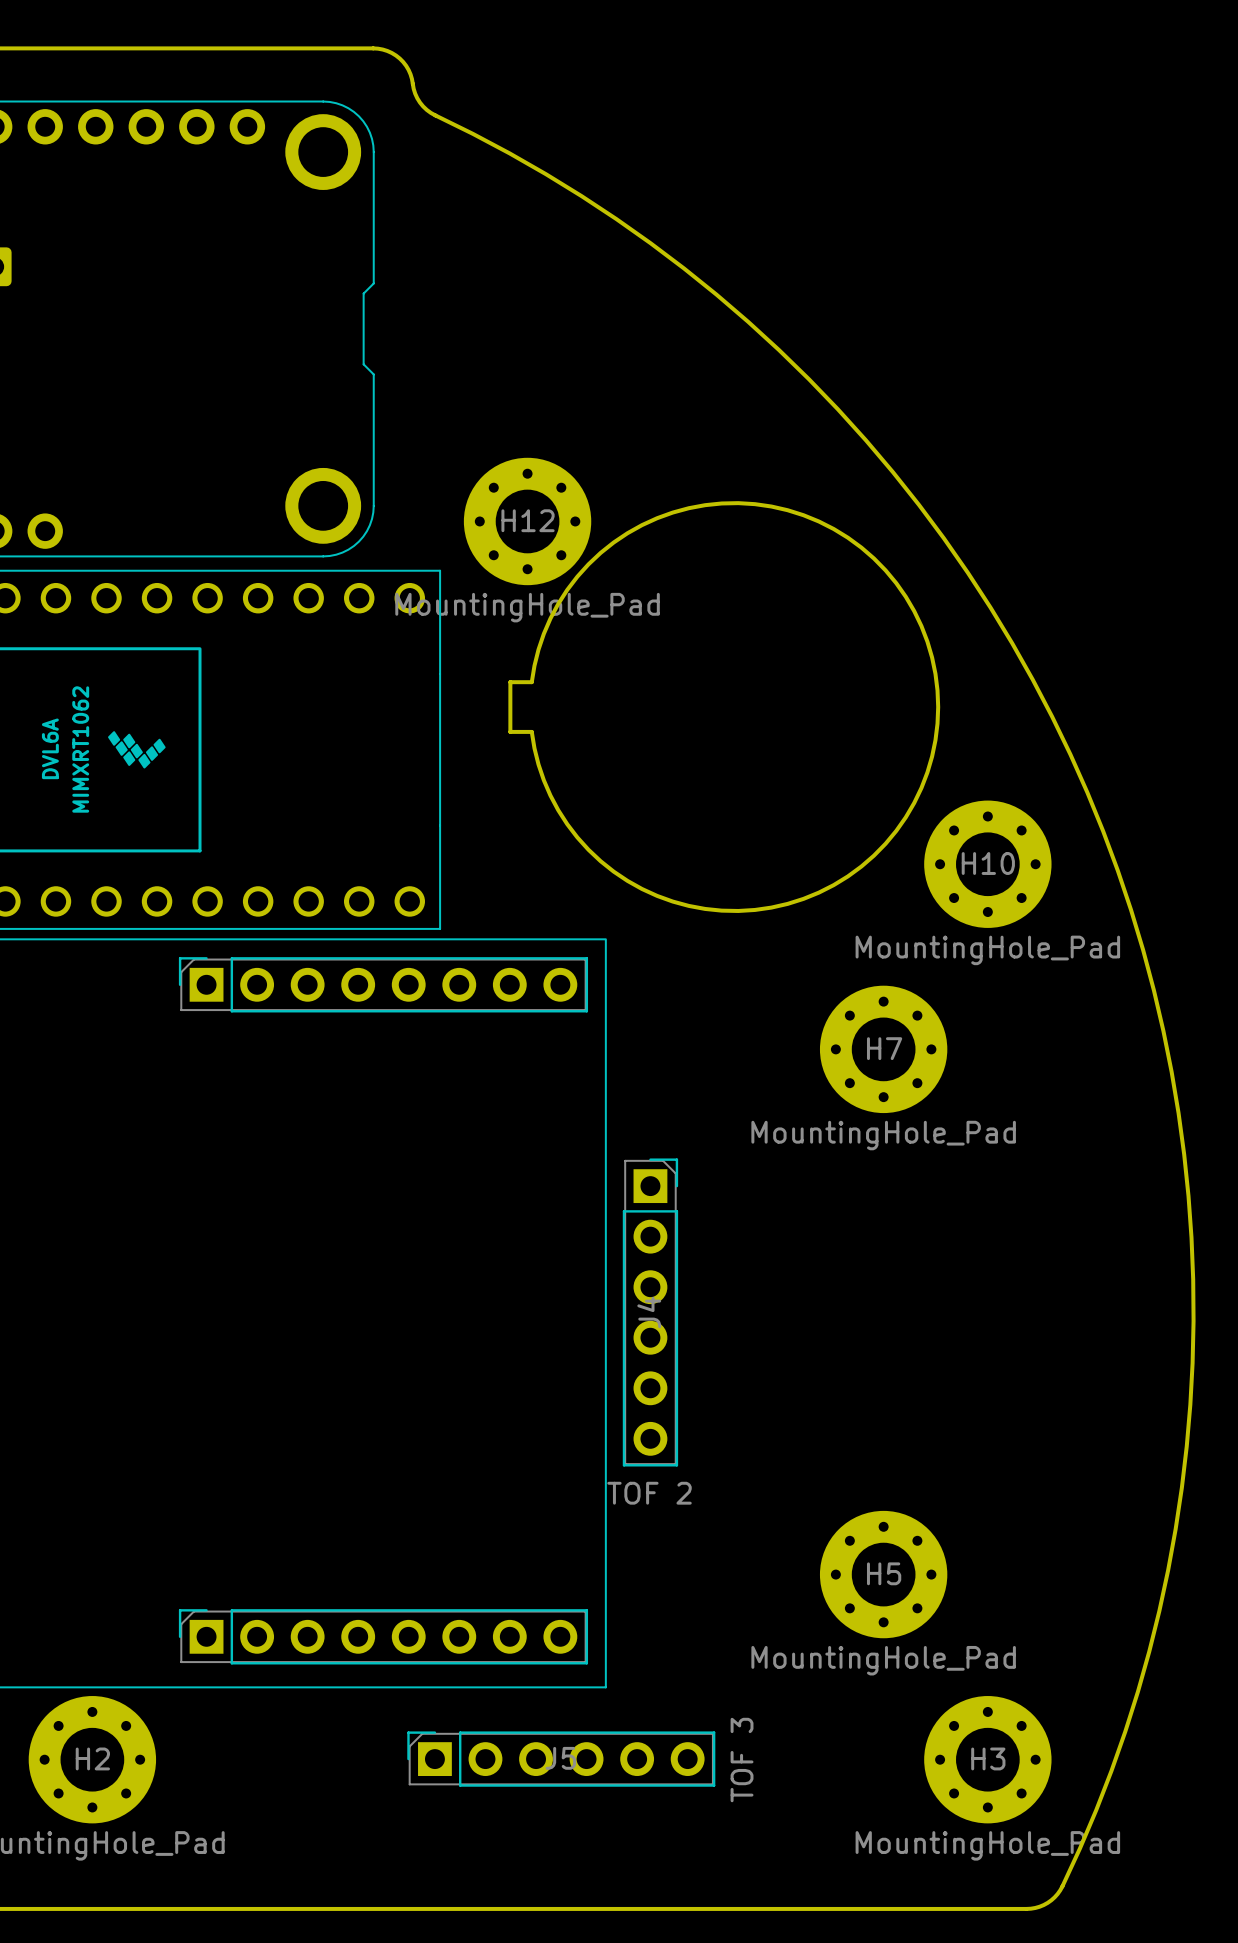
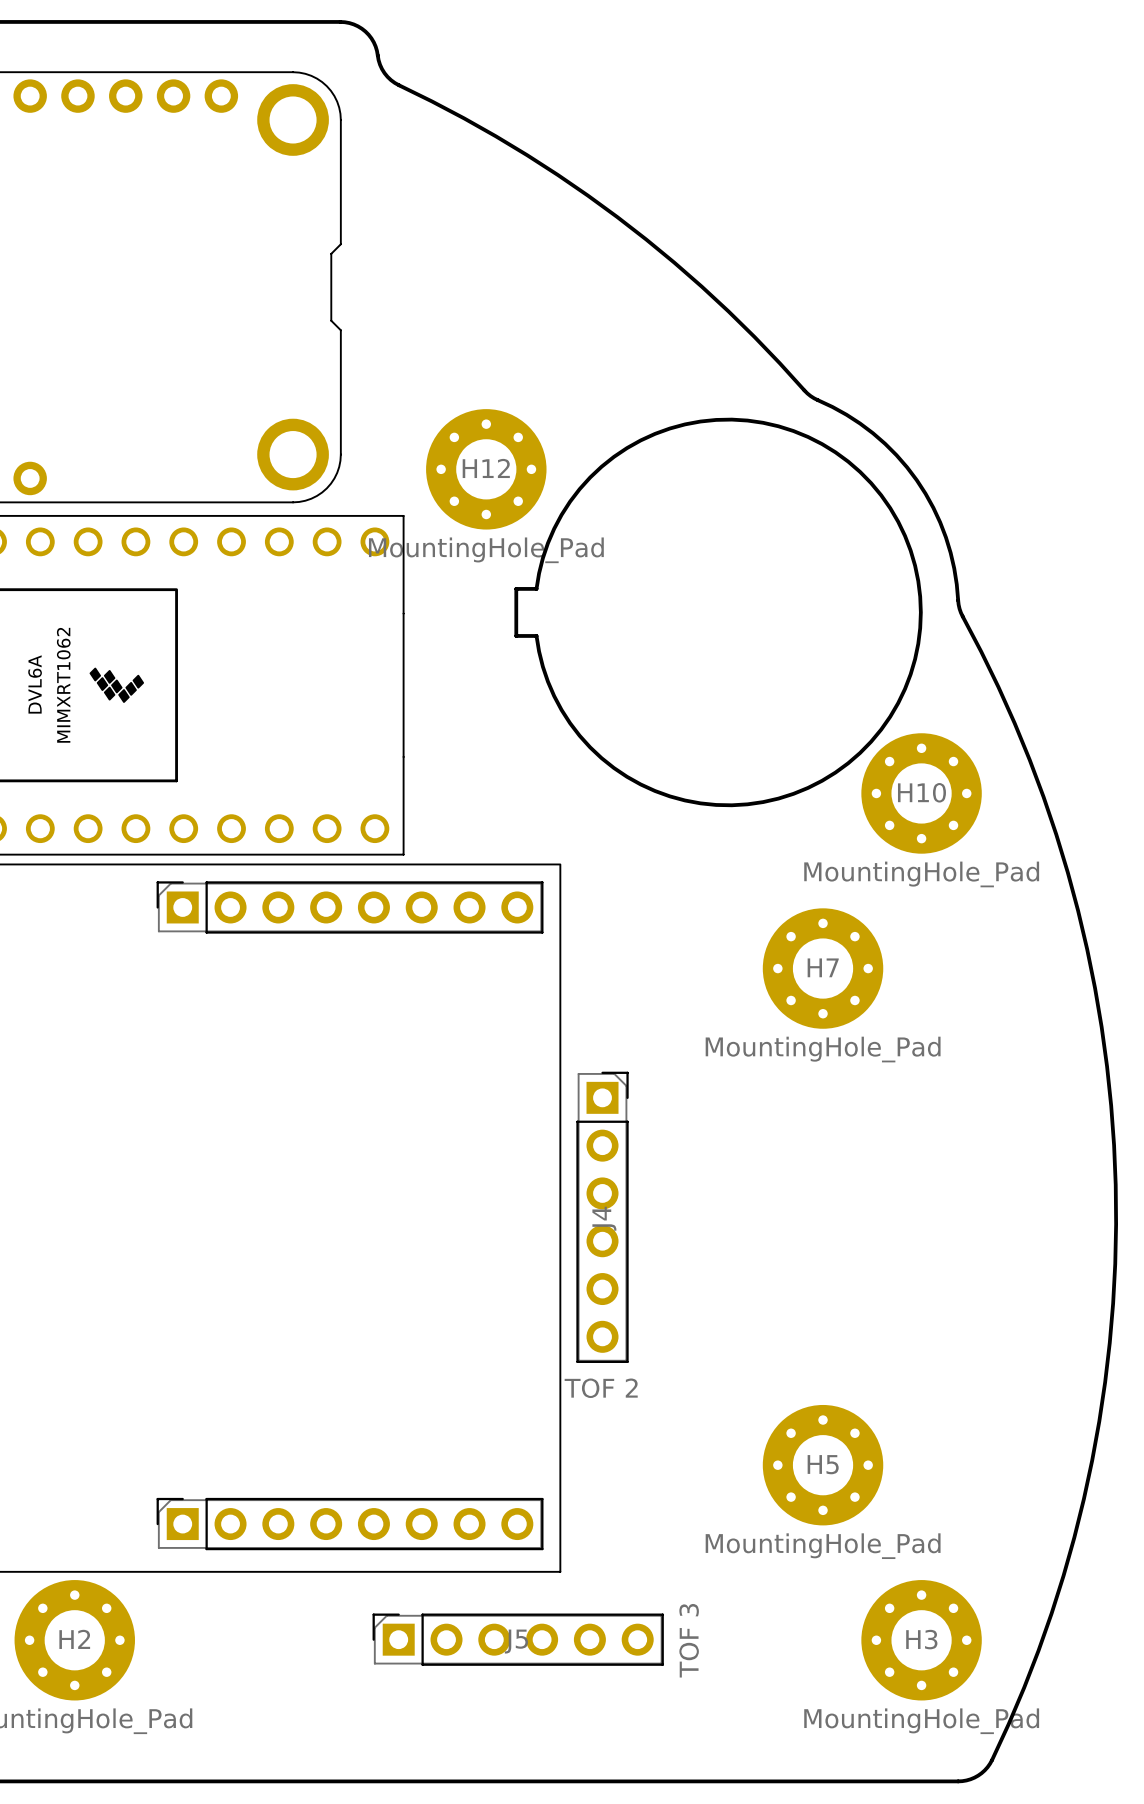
board edge: (435, 115) (546, 174) (650, 243) (716, 294) (778, 350) (865, 440) (943, 538) (1012, 643) (1070, 754) (1117, 870) (1153, 990) (1178, 1113) (1191, 1237) (1192, 1363) (1181, 1487) (1159, 1611) (1125, 1731) (1096, 1810) (1062, 1886) -> (399, 85) (495, 136) (557, 174) (617, 217) (674, 262) (728, 311) (807, 393) (860, 423) (896, 455) (916, 480) (940, 522) (954, 568) (960, 612) (998, 687) (1043, 797) (1067, 872) (1087, 949) (1107, 1066) (1115, 1184) (1113, 1303) (1099, 1421) (1074, 1537) (1038, 1650) (992, 1760)
board edge: (510, 682) (531, 682) (543, 633) (558, 603) (588, 564) (613, 542) (641, 525) (672, 512) (705, 505) (754, 504) (787, 510) (833, 529) (873, 558) (896, 583) (921, 626) (932, 657) (937, 690) (937, 723) (927, 772) (914, 802) (885, 843) (861, 866) (833, 885) (803, 898) (771, 907) (721, 910) (688, 905) (657, 895) (613, 871) (588, 849) (567, 824) (550, 795) (538, 764) (531, 731) (510, 731) (510, 682) -> (516, 588) (536, 588) (542, 558) (561, 514) (590, 477) (613, 456) (655, 433) (685, 424) (716, 419) (747, 420) (778, 426) (822, 444) (848, 461) (881, 495) (898, 521) (915, 565) (920, 596) (920, 628) (915, 659) (905, 688) (881, 729) (860, 752) (822, 780) (793, 793) (747, 804) (716, 804) (685, 800) (655, 791) (627, 776) (590, 747) (570, 723) (554, 696) (542, 666) (536, 635) (516, 635) (516, 588)

